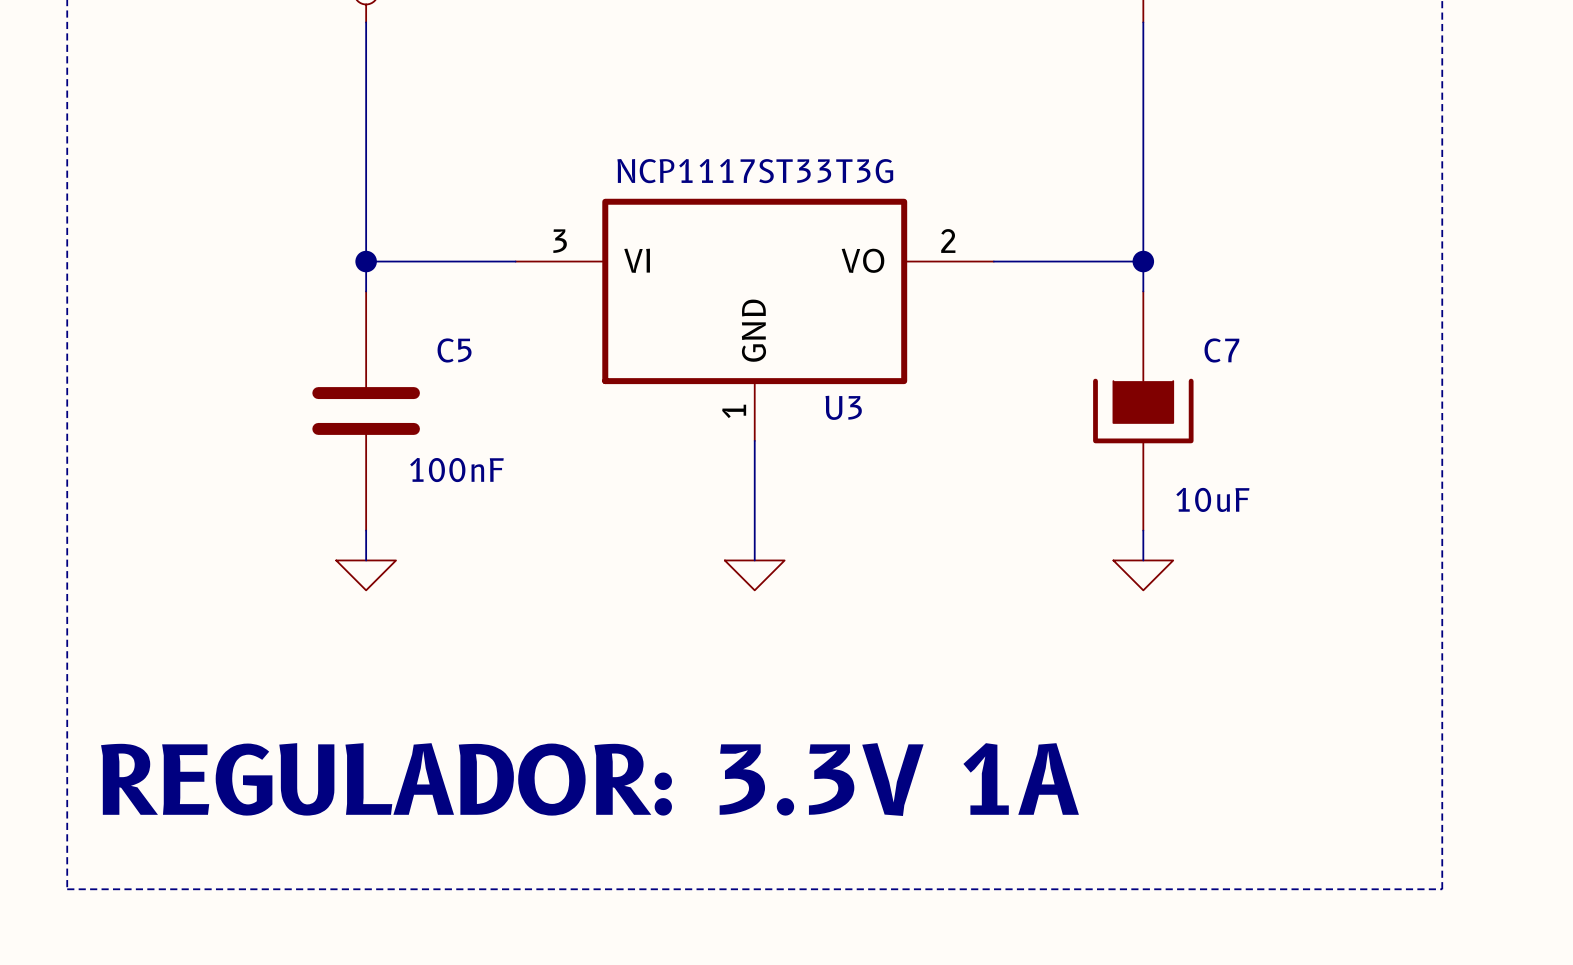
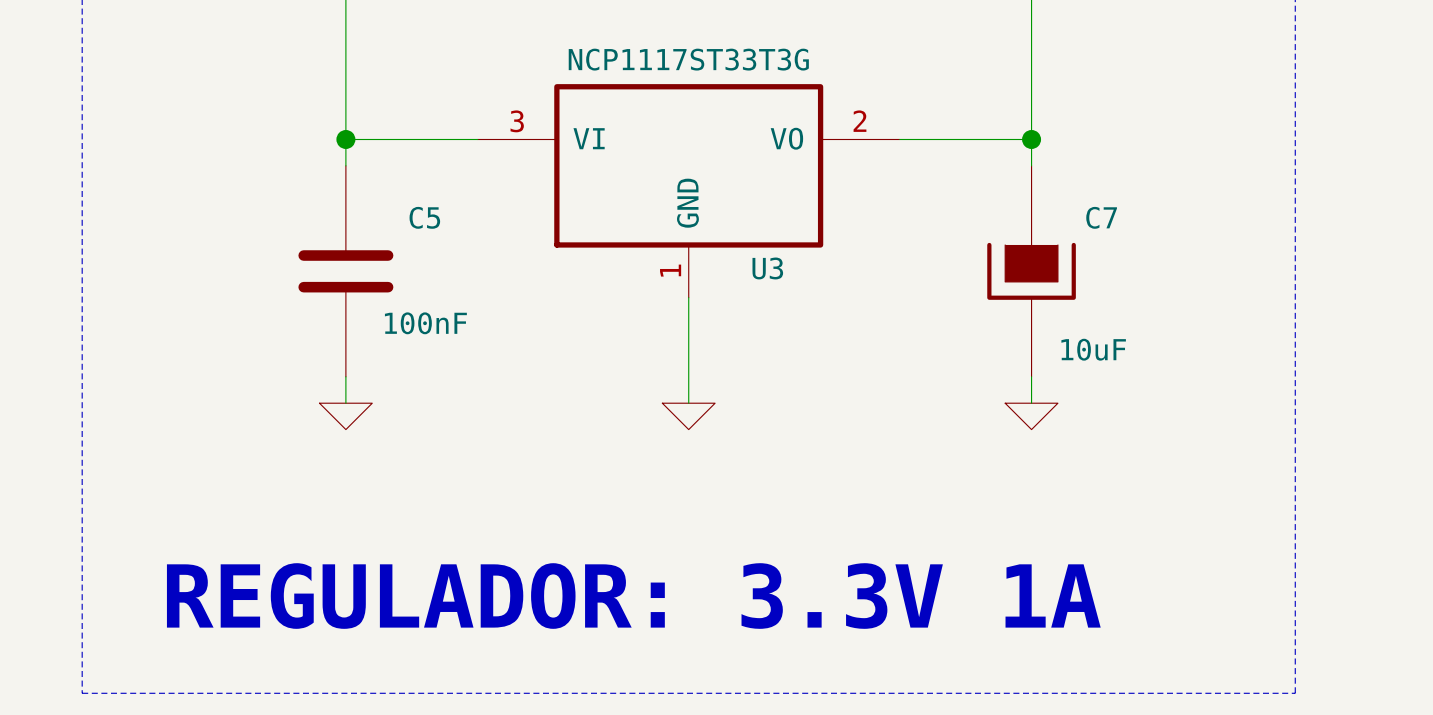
text position: REGULADOR: 3.3V 1A (589, 779) -> REGULADOR: 3.3V 1A (633, 596)

